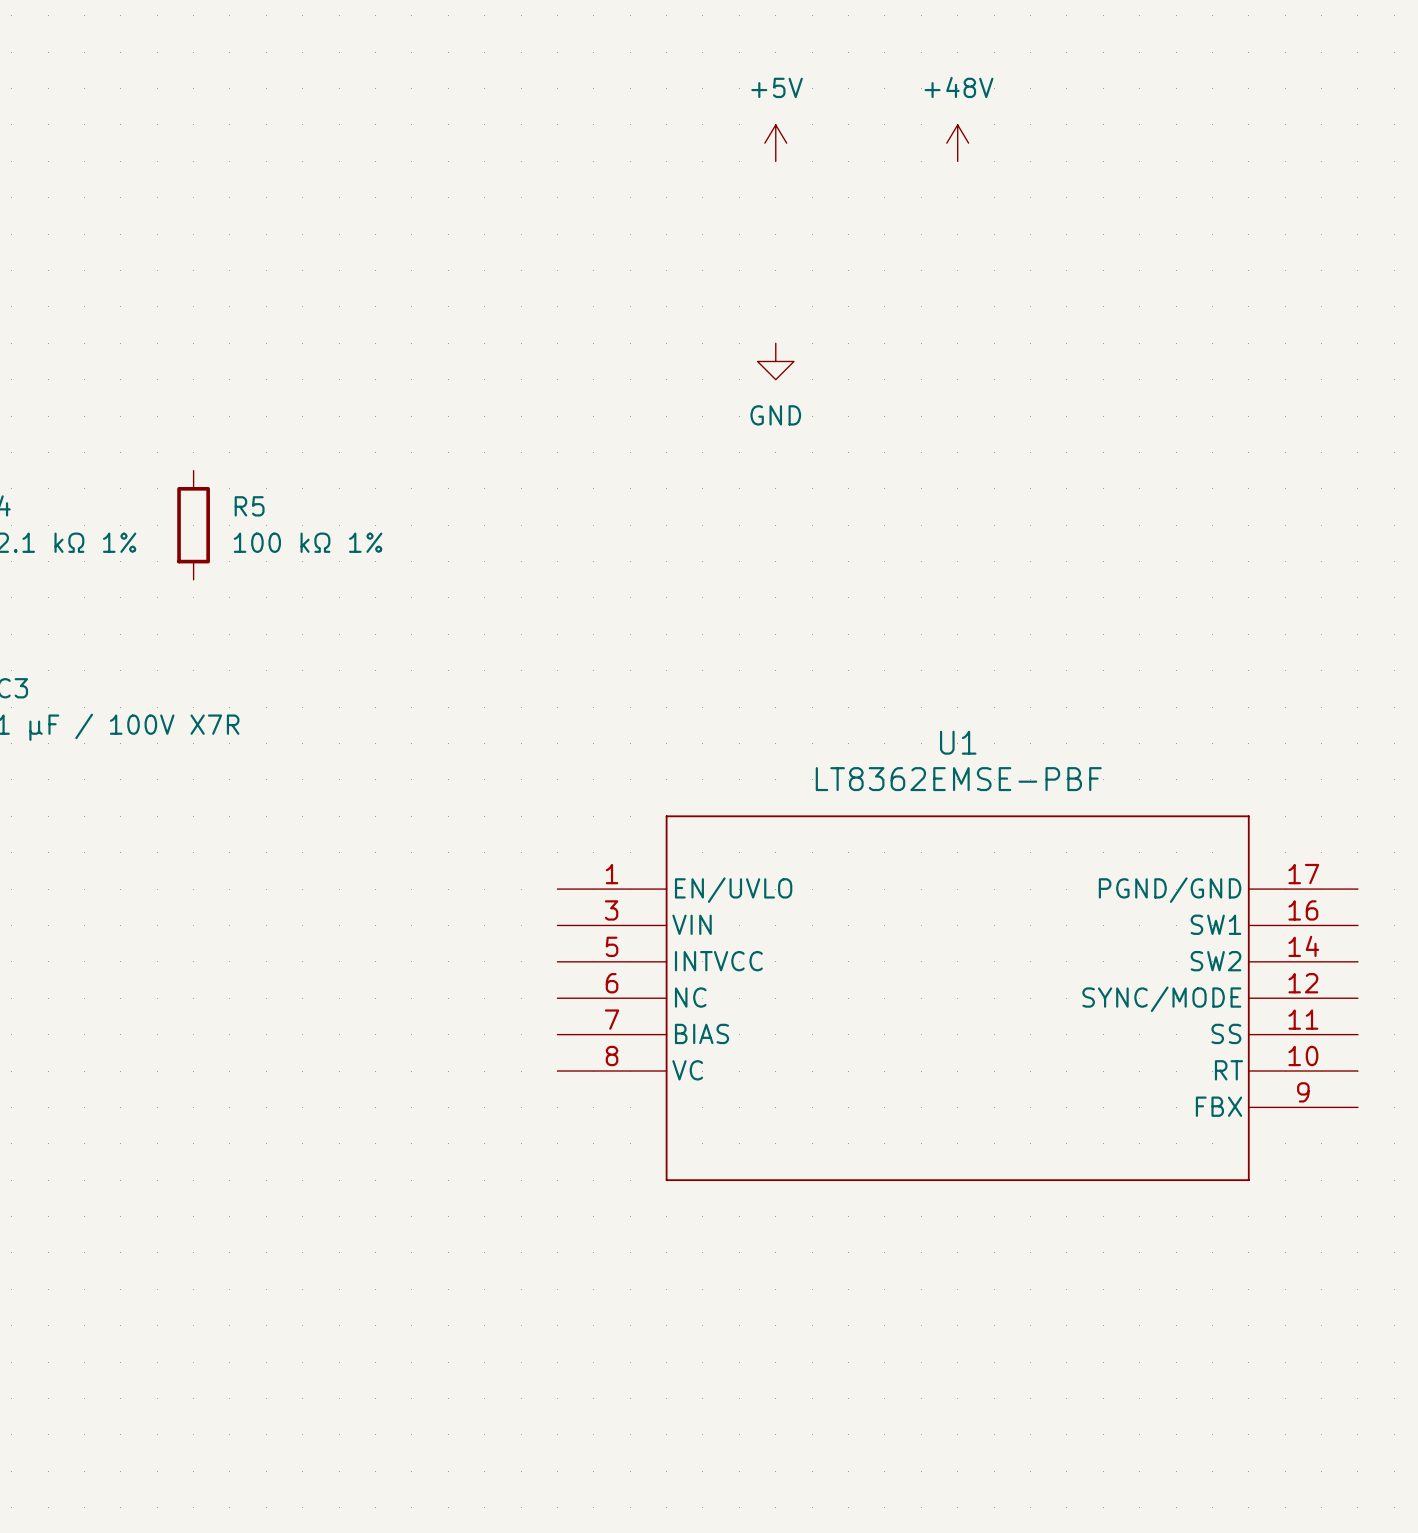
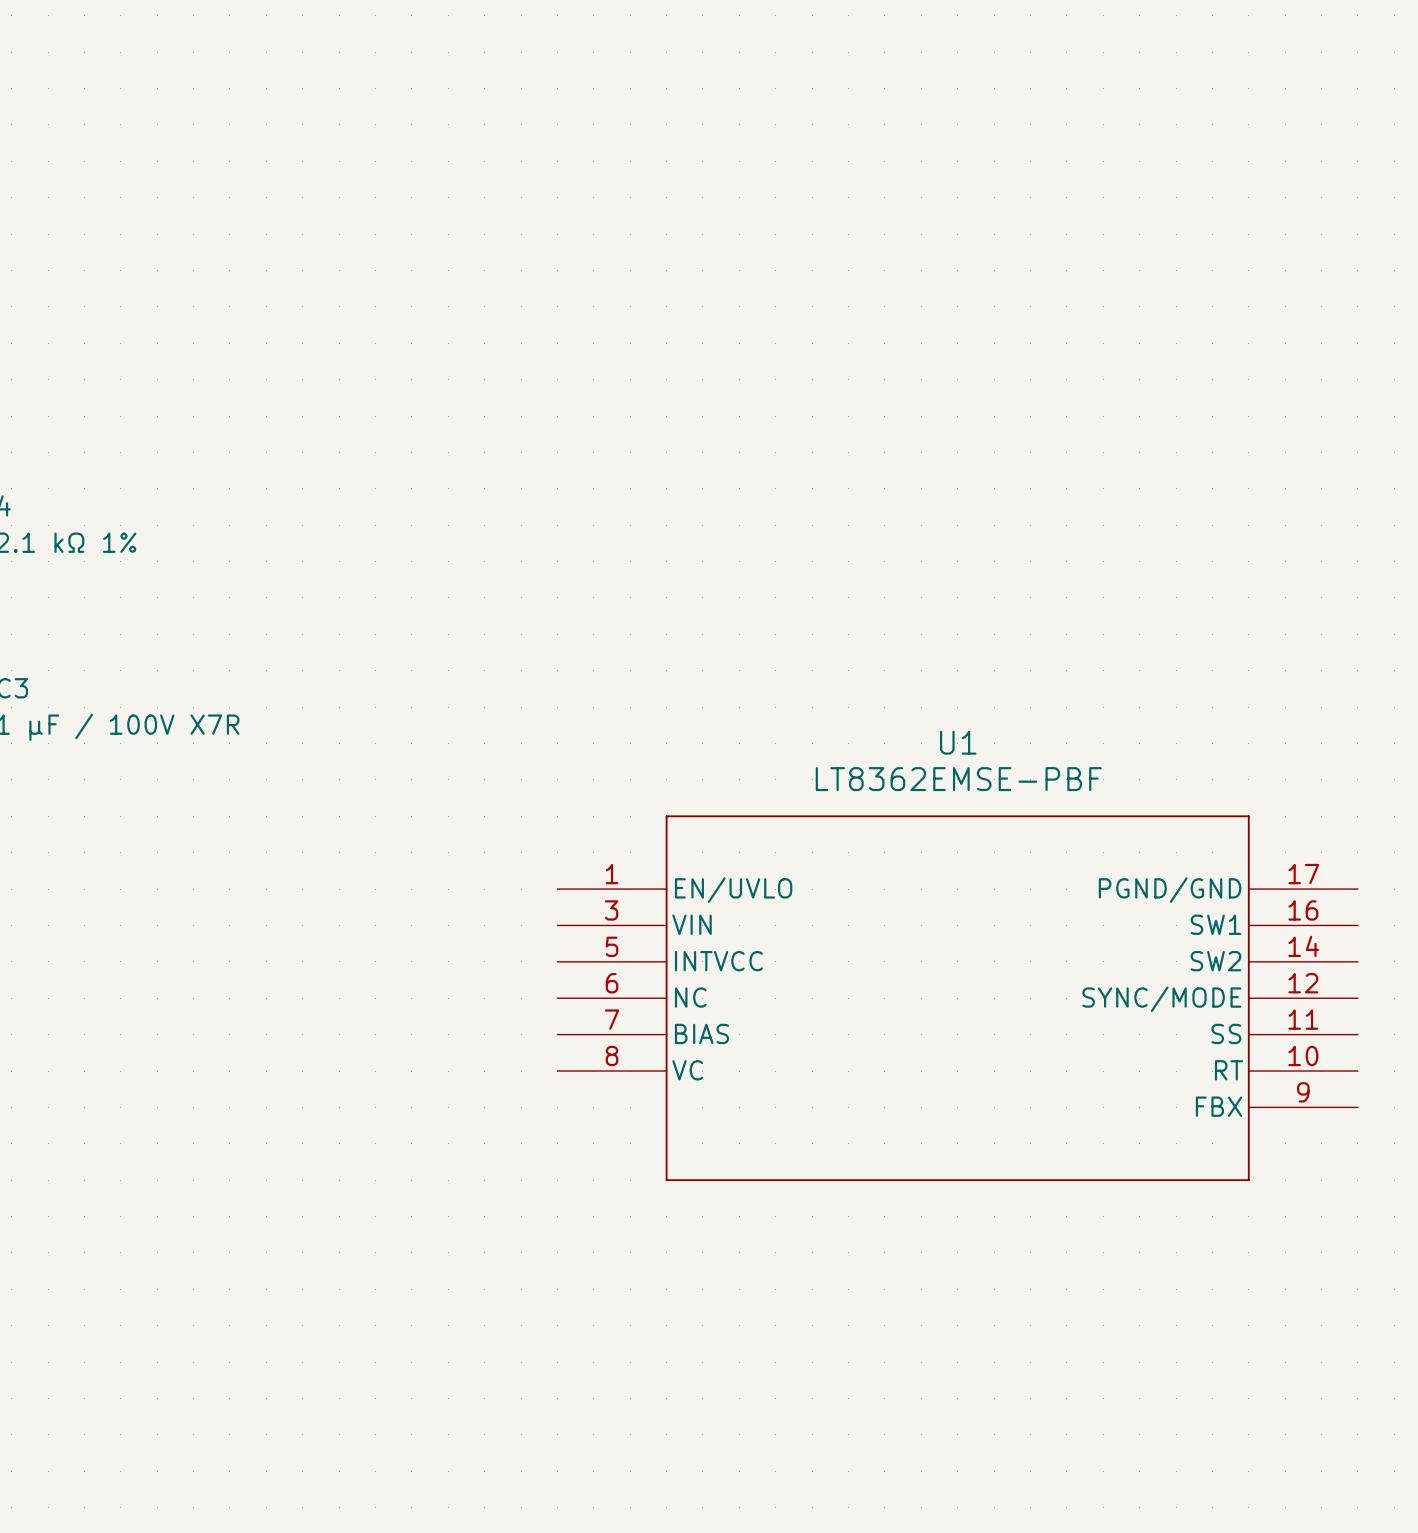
power symbol: +5V (775, 143) -> none
power symbol: +48V (957, 143) -> none
power symbol: GND (775, 361) -> none
R5: 100 kΩ 1% (193, 525) -> none

